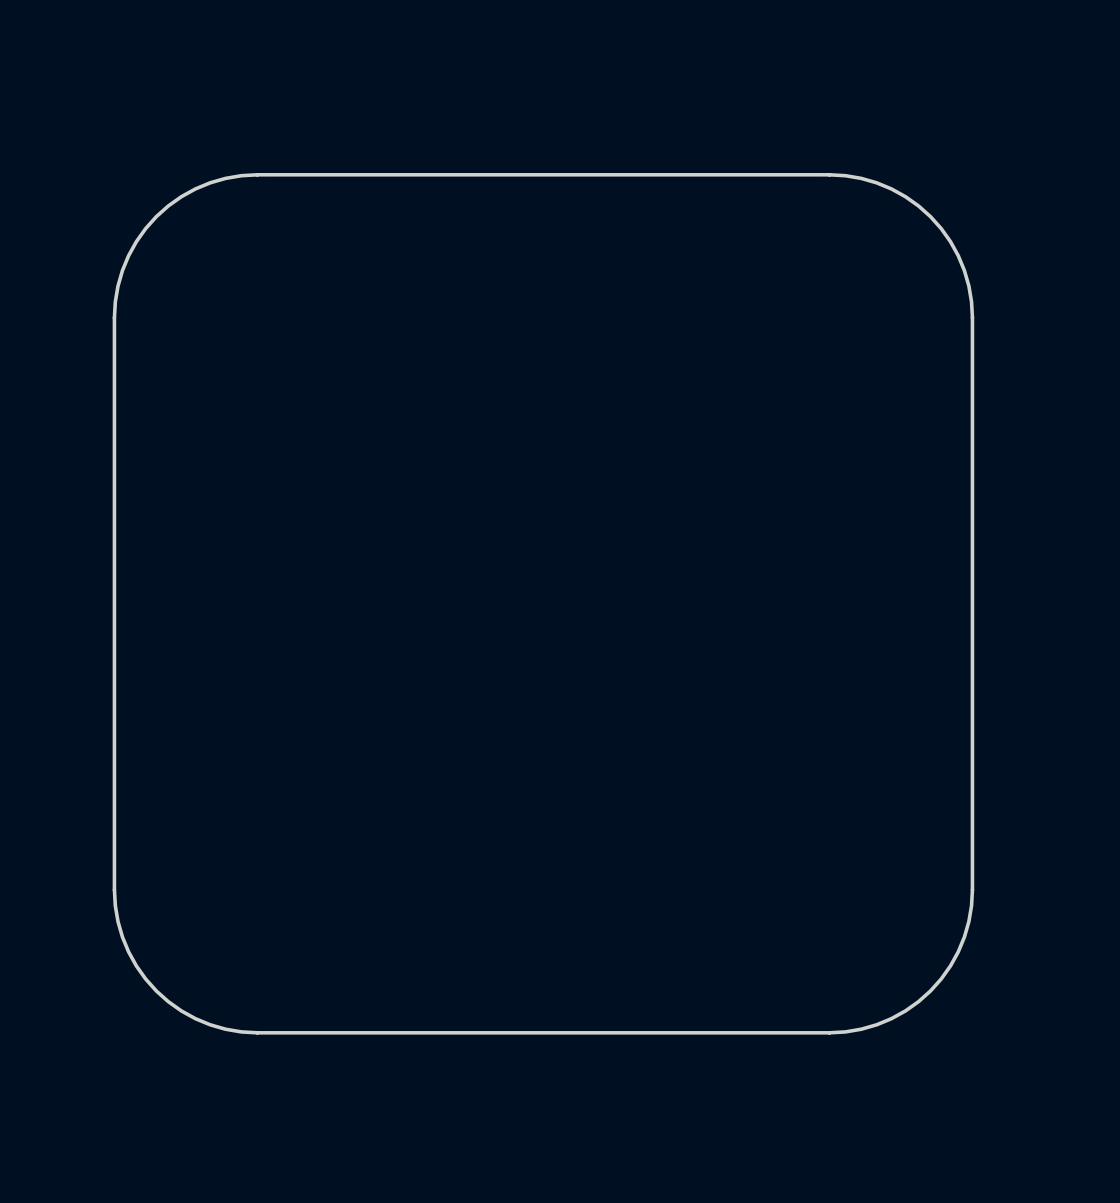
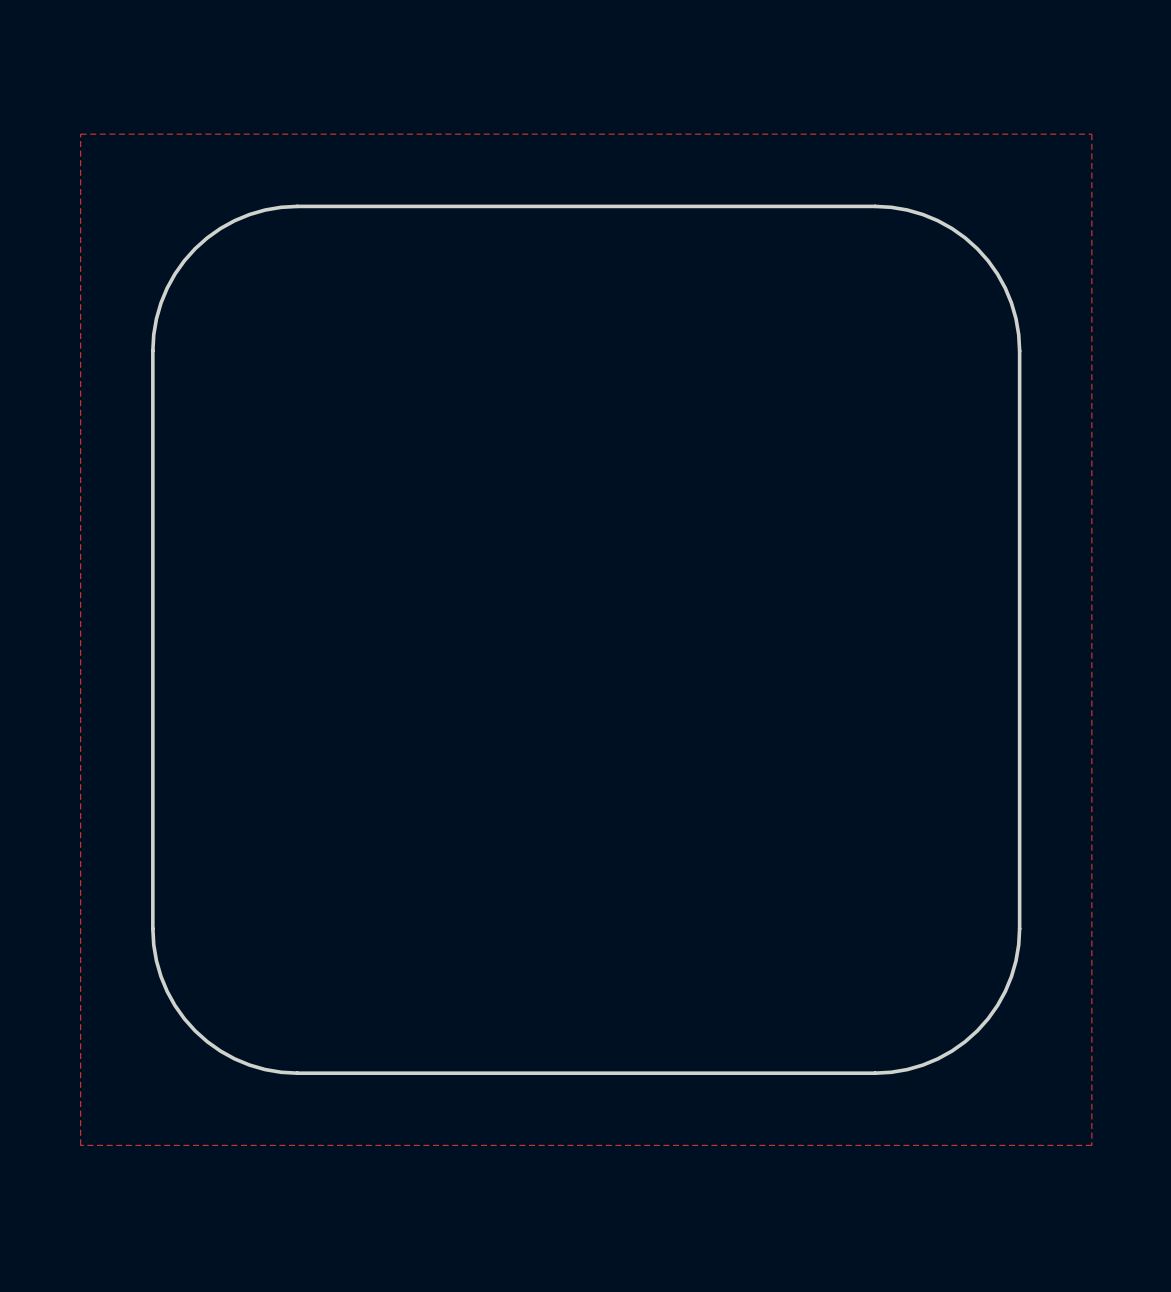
zone outline: none -> (80, 134) (1091, 134) (1091, 1145) (80, 1145) (80, 134)

